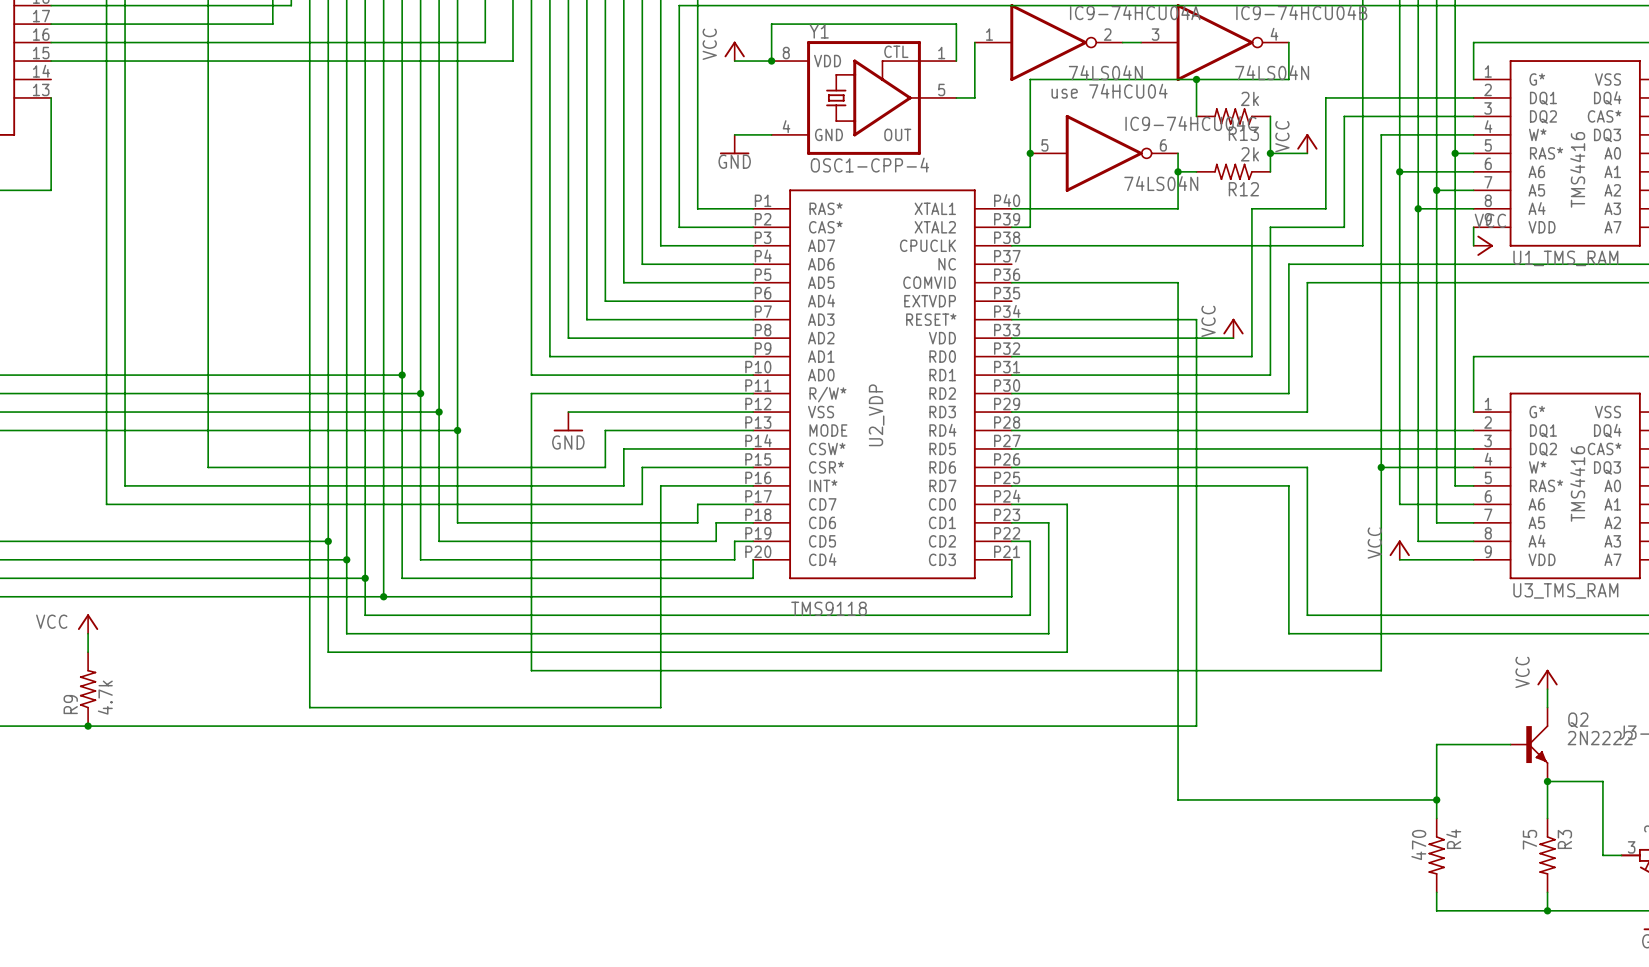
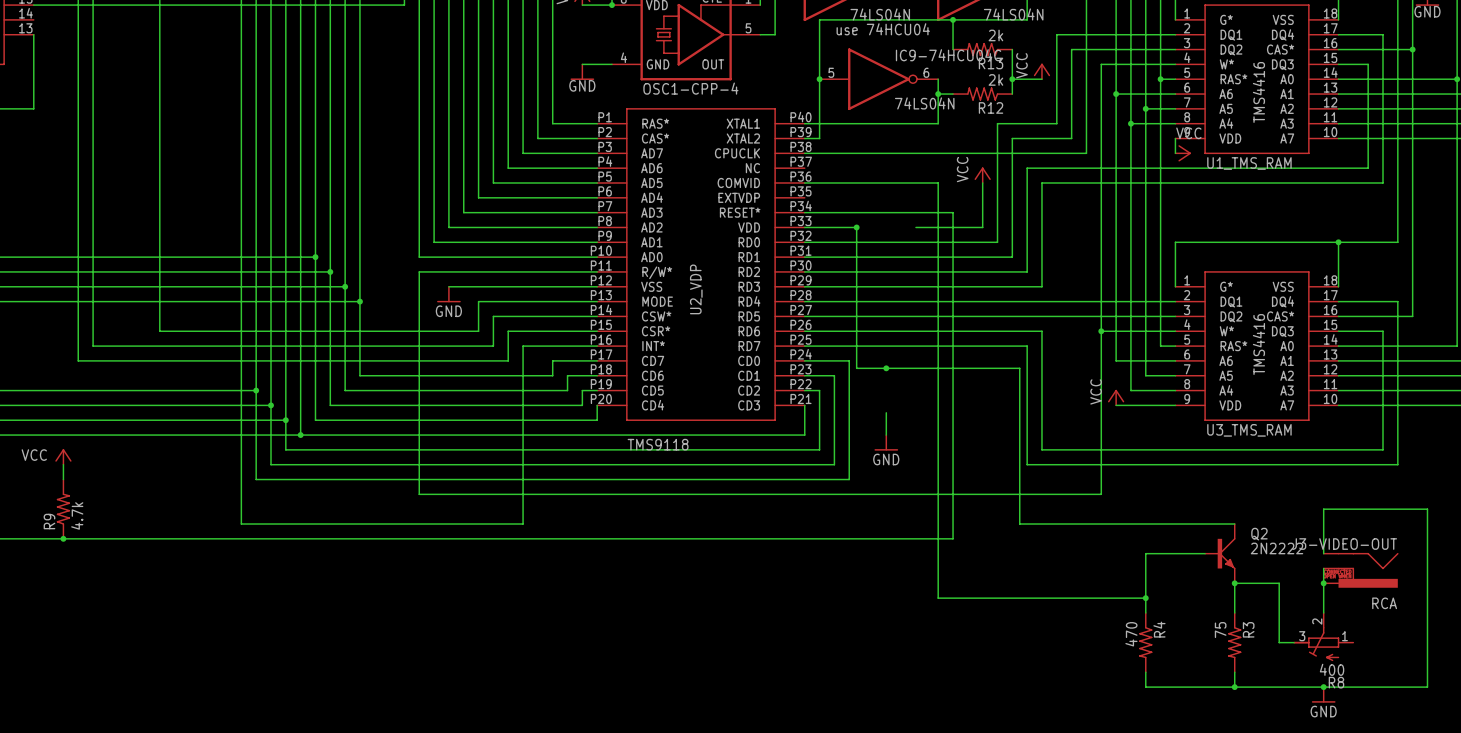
wire: none -> (982, 182) (982, 227)
power symbol position: VCC (1233, 328) -> VCC (982, 175)
wire: (1076, 338) (1150, 338) -> (856, 227) (856, 368) (1019, 368) (1019, 524) (1234, 524)
junction: none -> (856, 227)
junction: none -> (886, 368)
wire: none -> (886, 412) (886, 435)
power symbol: none -> GND (886, 442)
power symbol: VCC (1547, 679) -> none
wire: (1547, 689) (1547, 707) -> none

